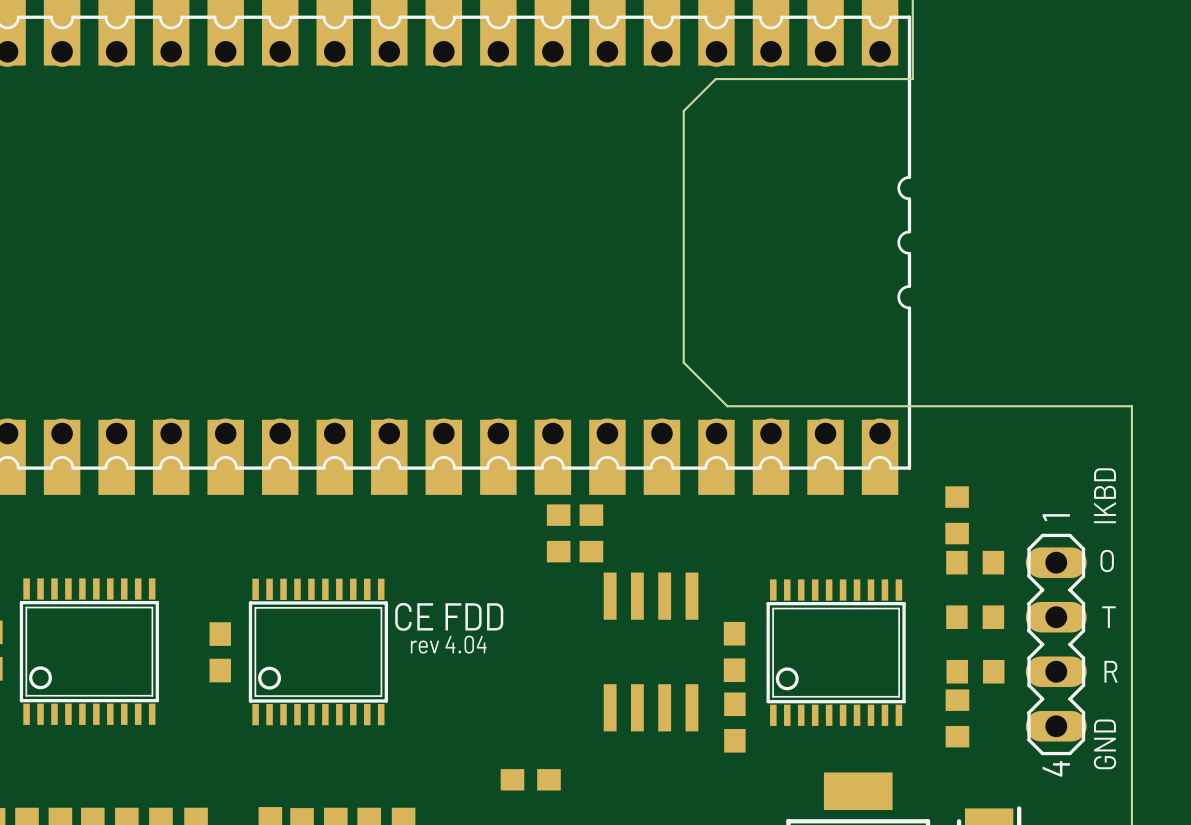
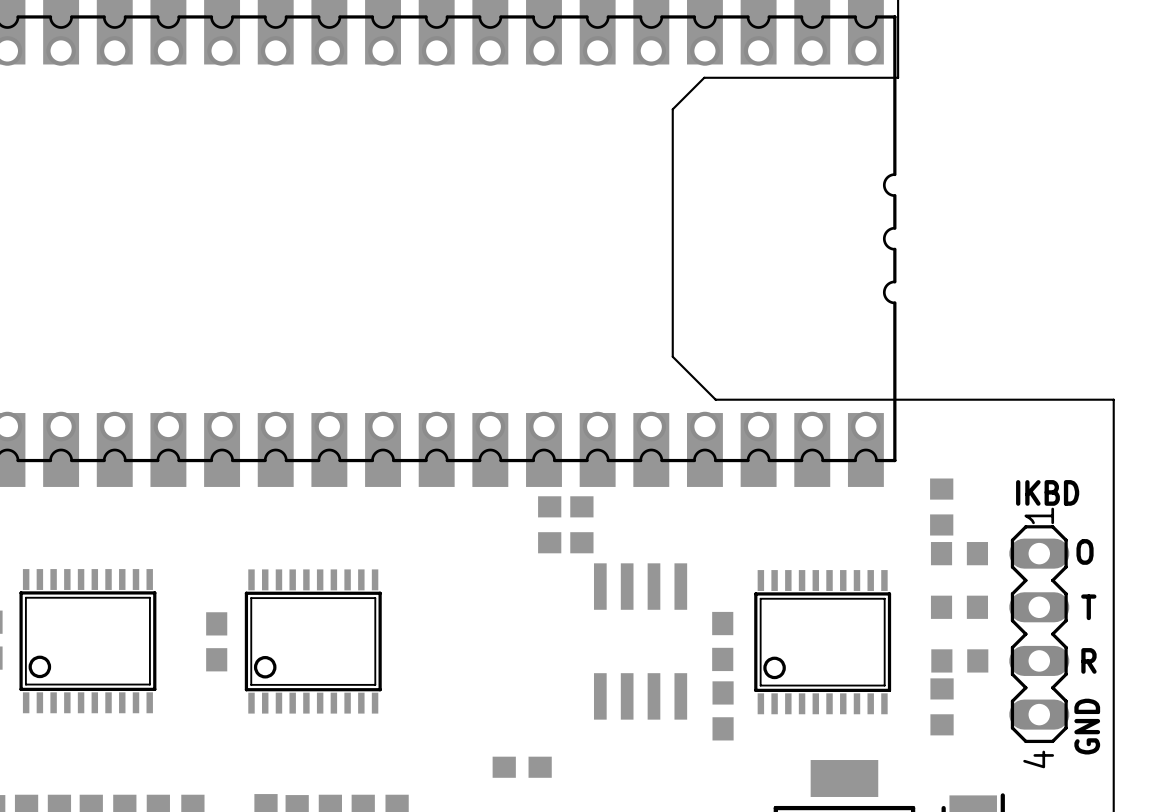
text rotation: 0° (1105, 495) -> 90° clockwise (1047, 492)
text: CE FDD (449, 616) -> none
text: rev 4.04 (448, 644) -> none

